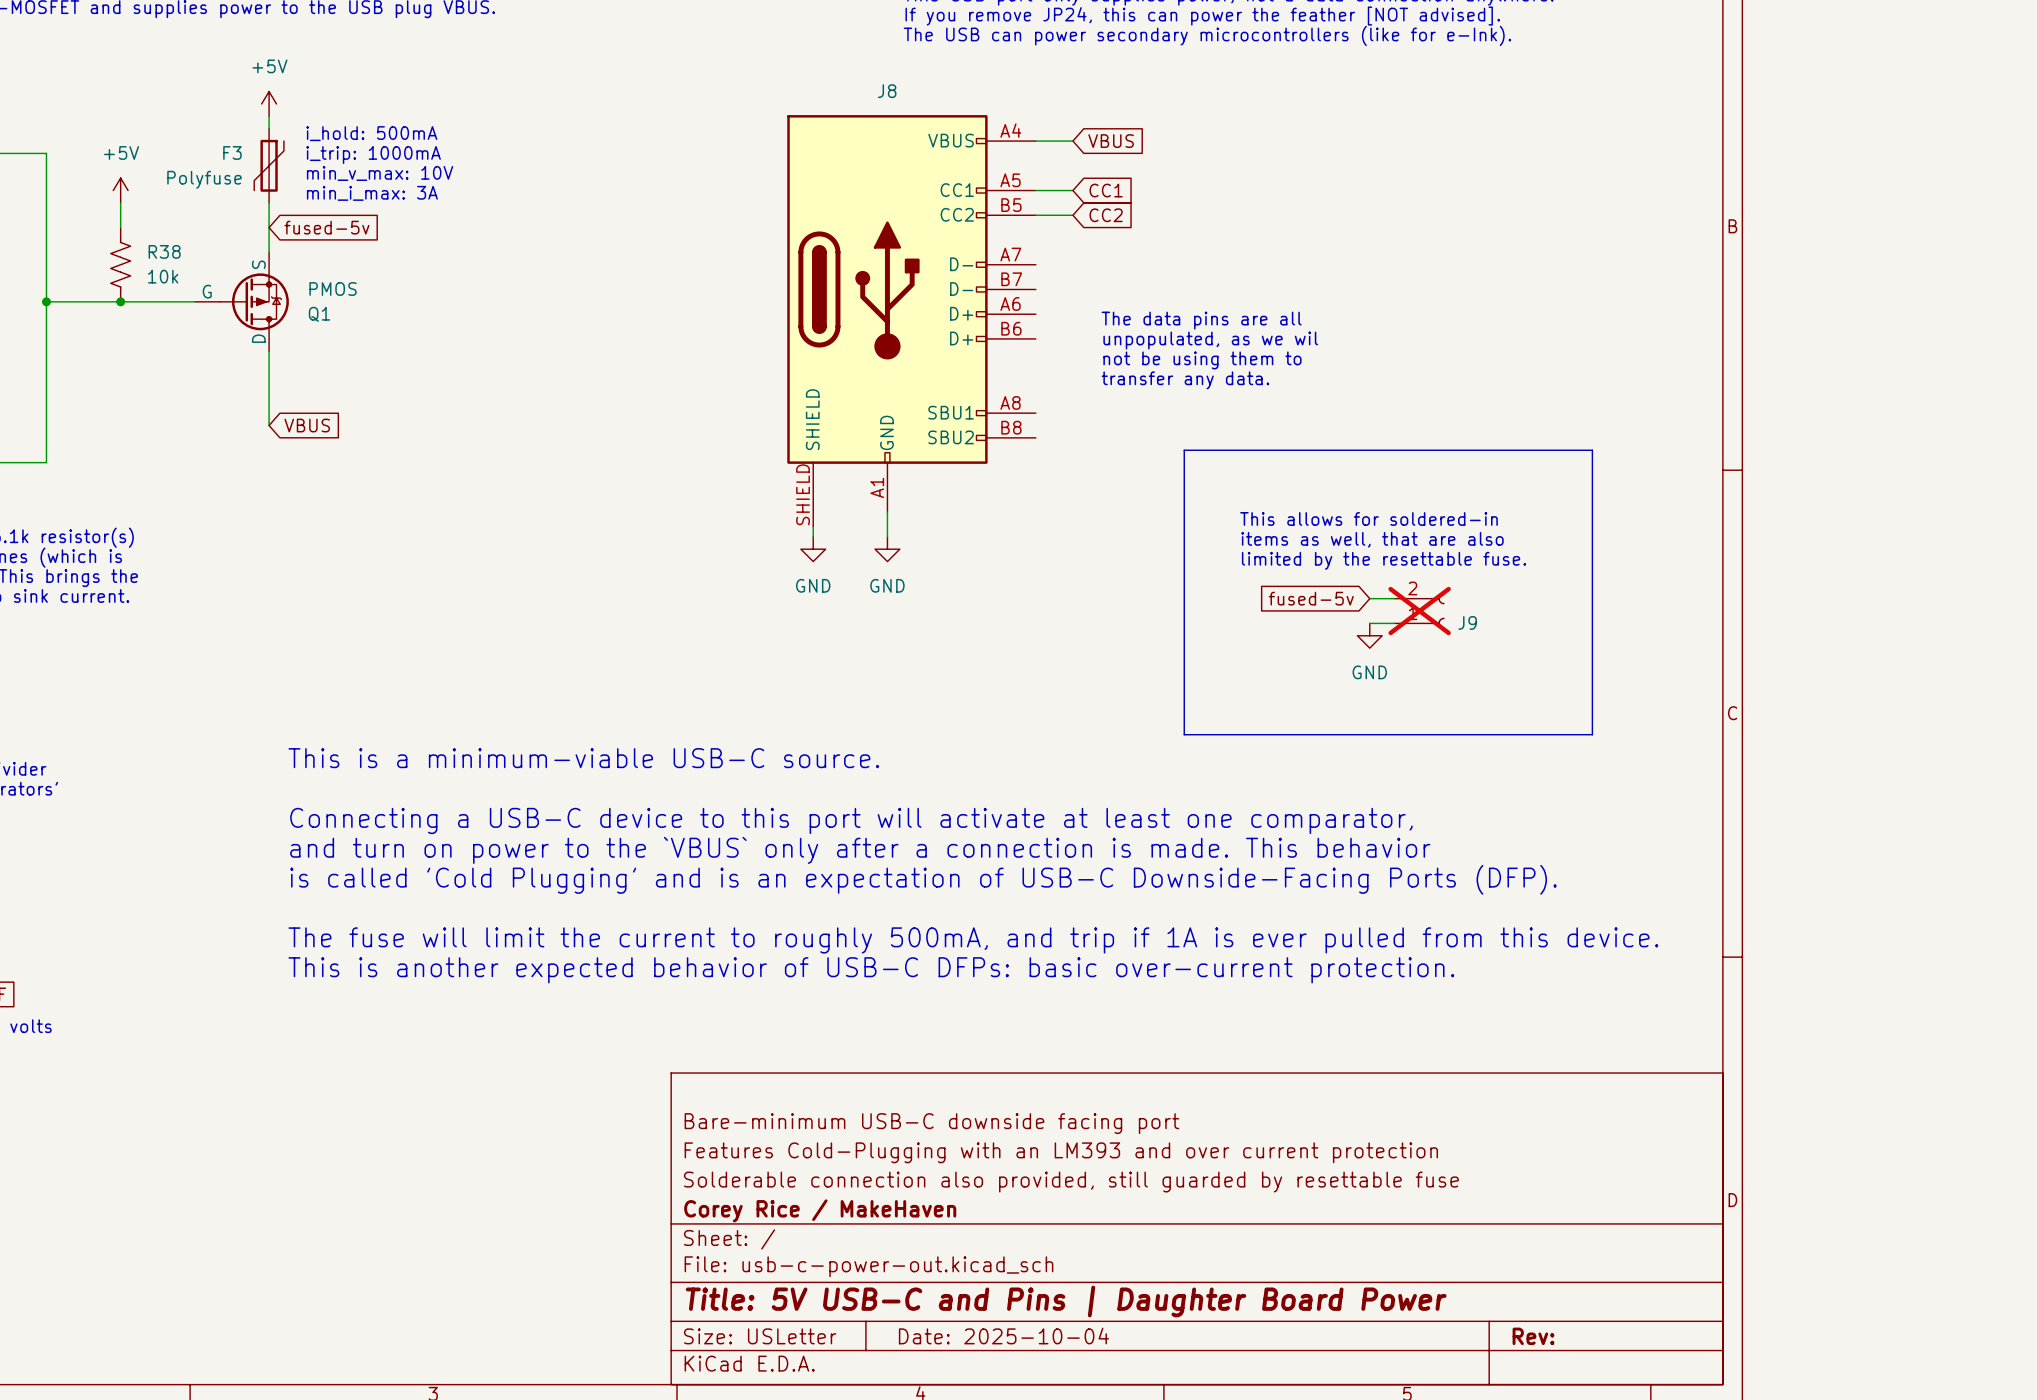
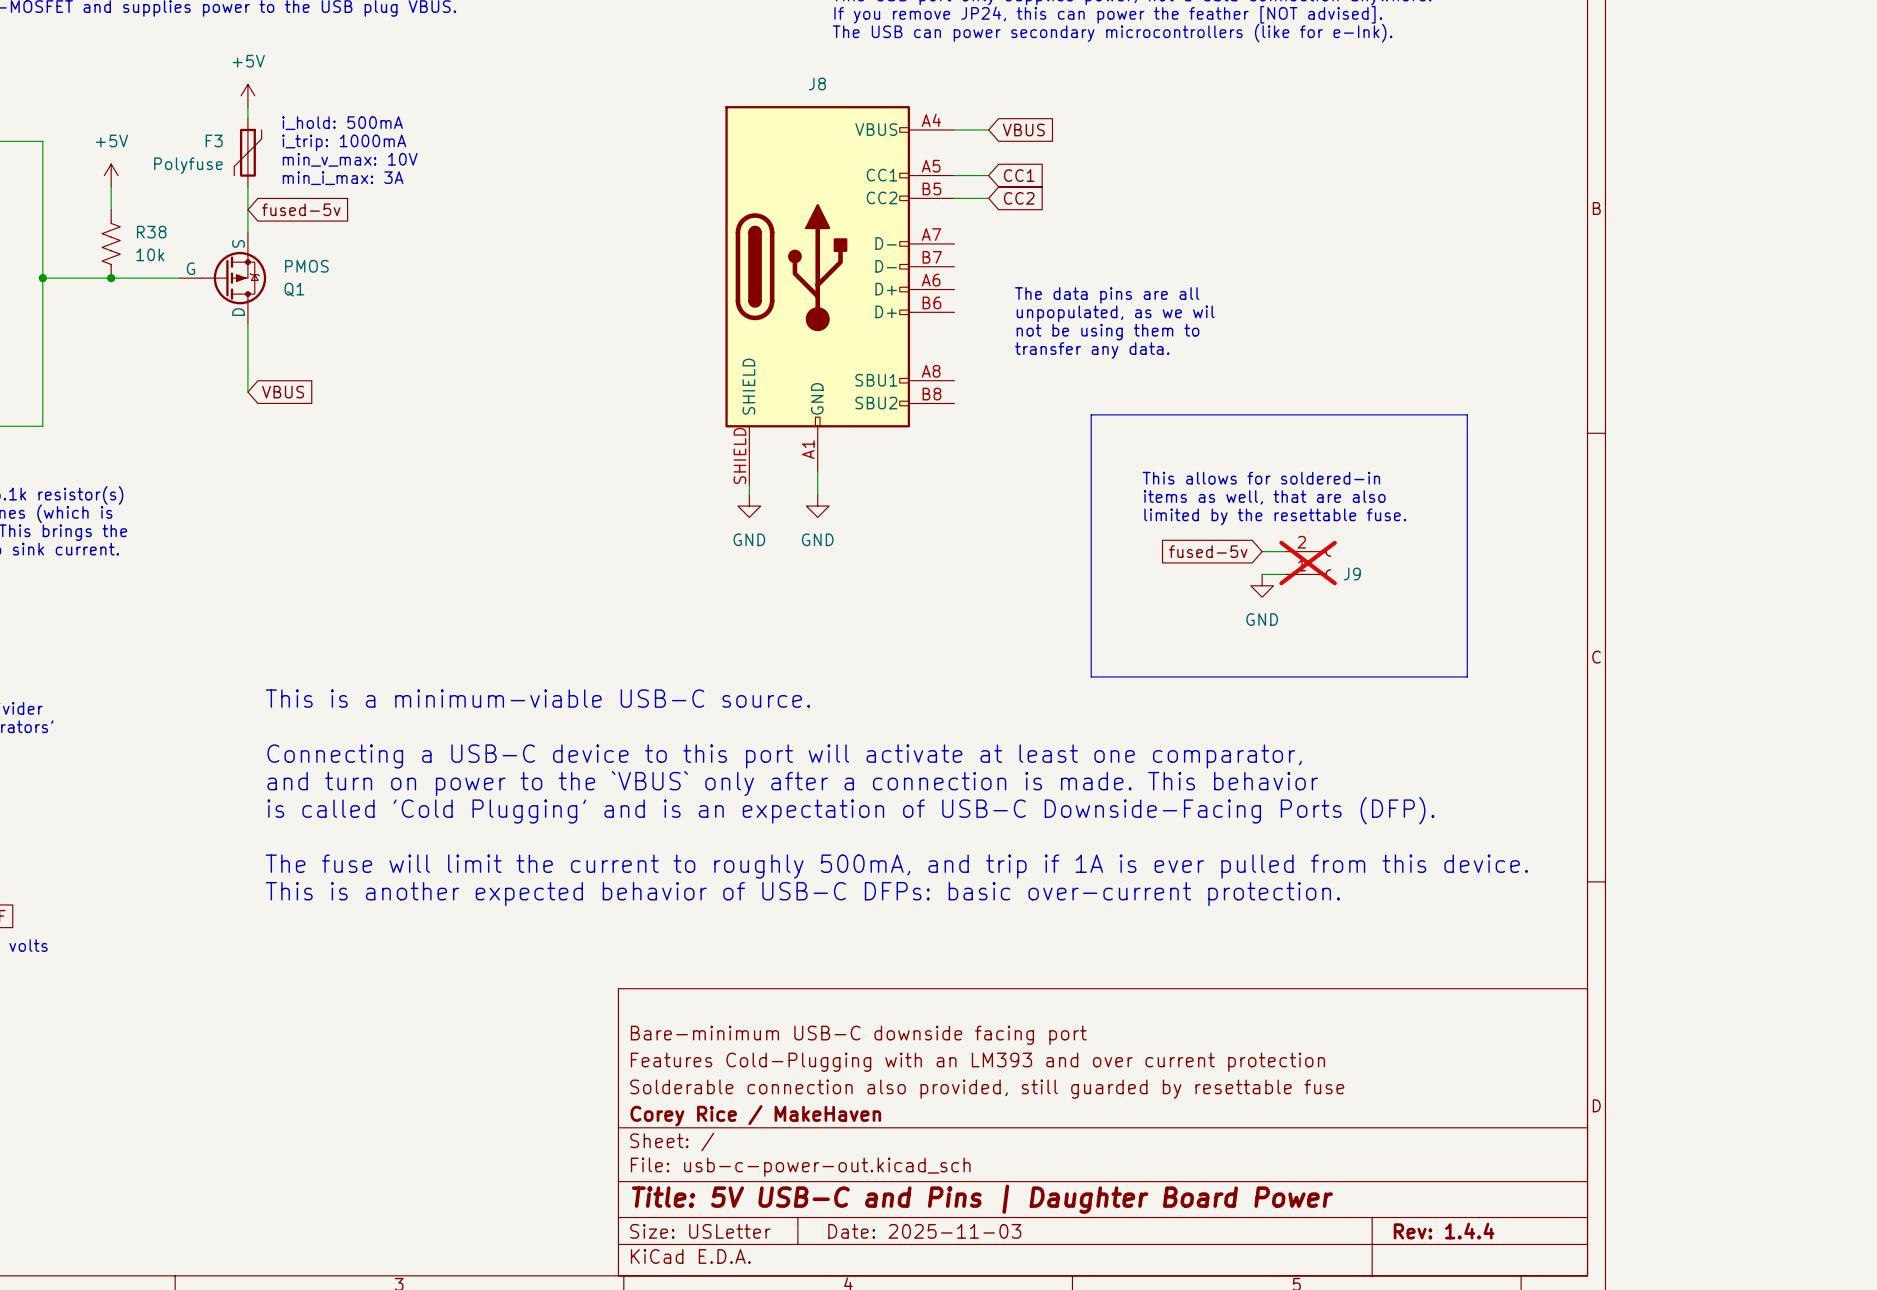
title block: Date: 2025-10-04 (1003, 1336) -> Date: 2025-11-03 (924, 1231)
title block: Rev: (1533, 1336) -> Rev: 1.4.4 (1444, 1231)

